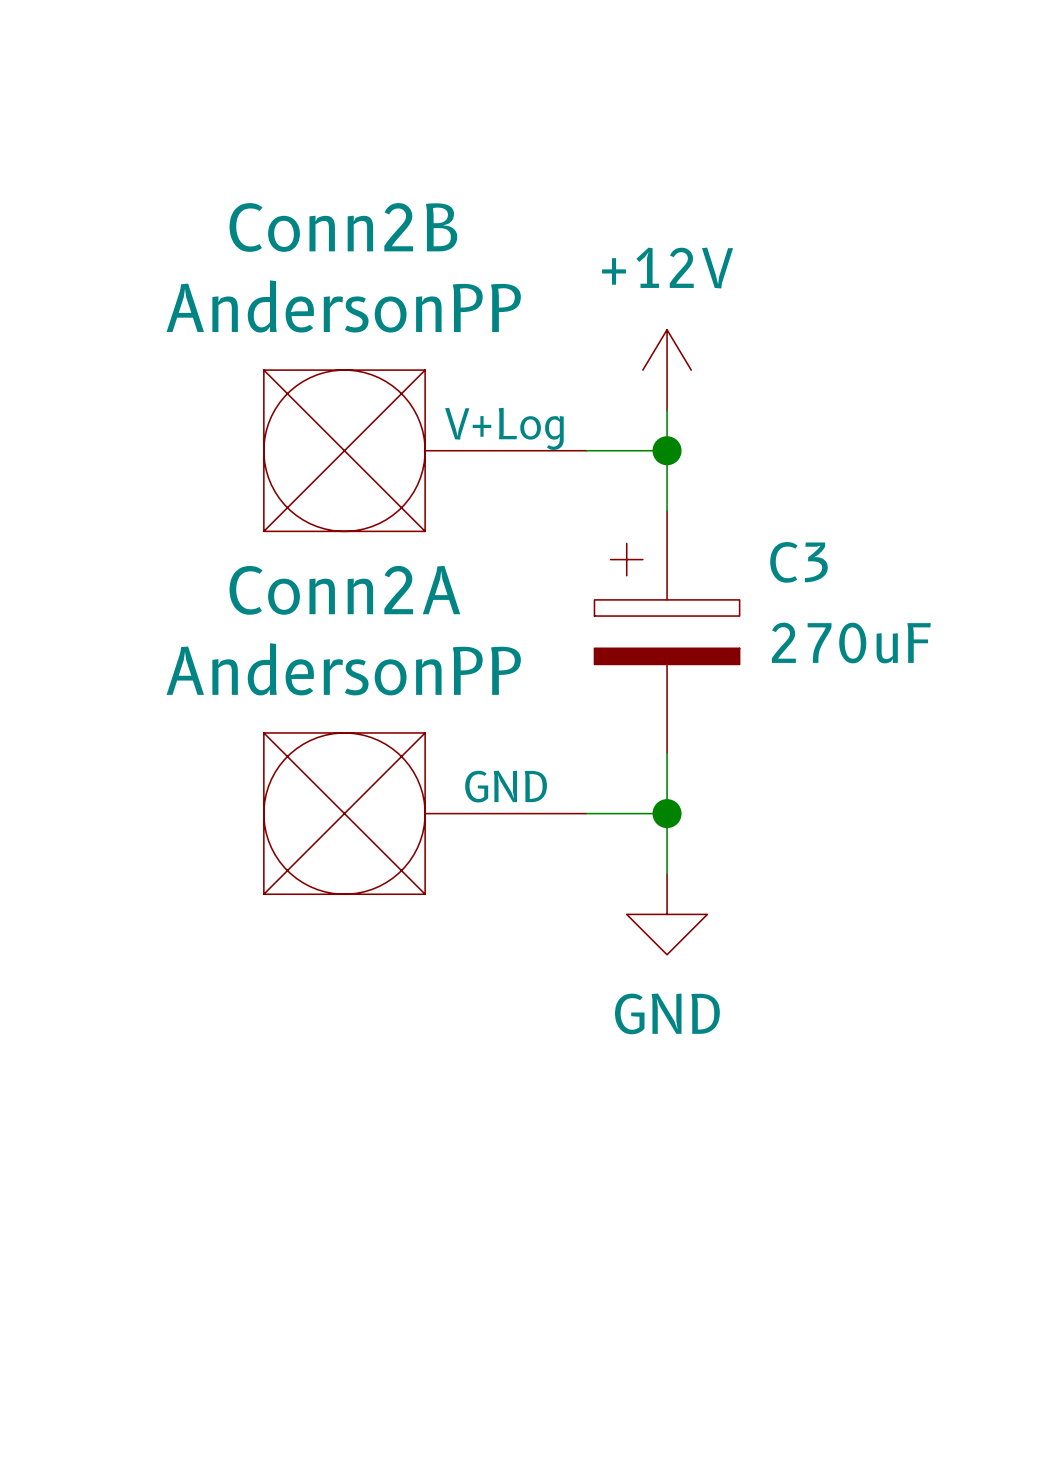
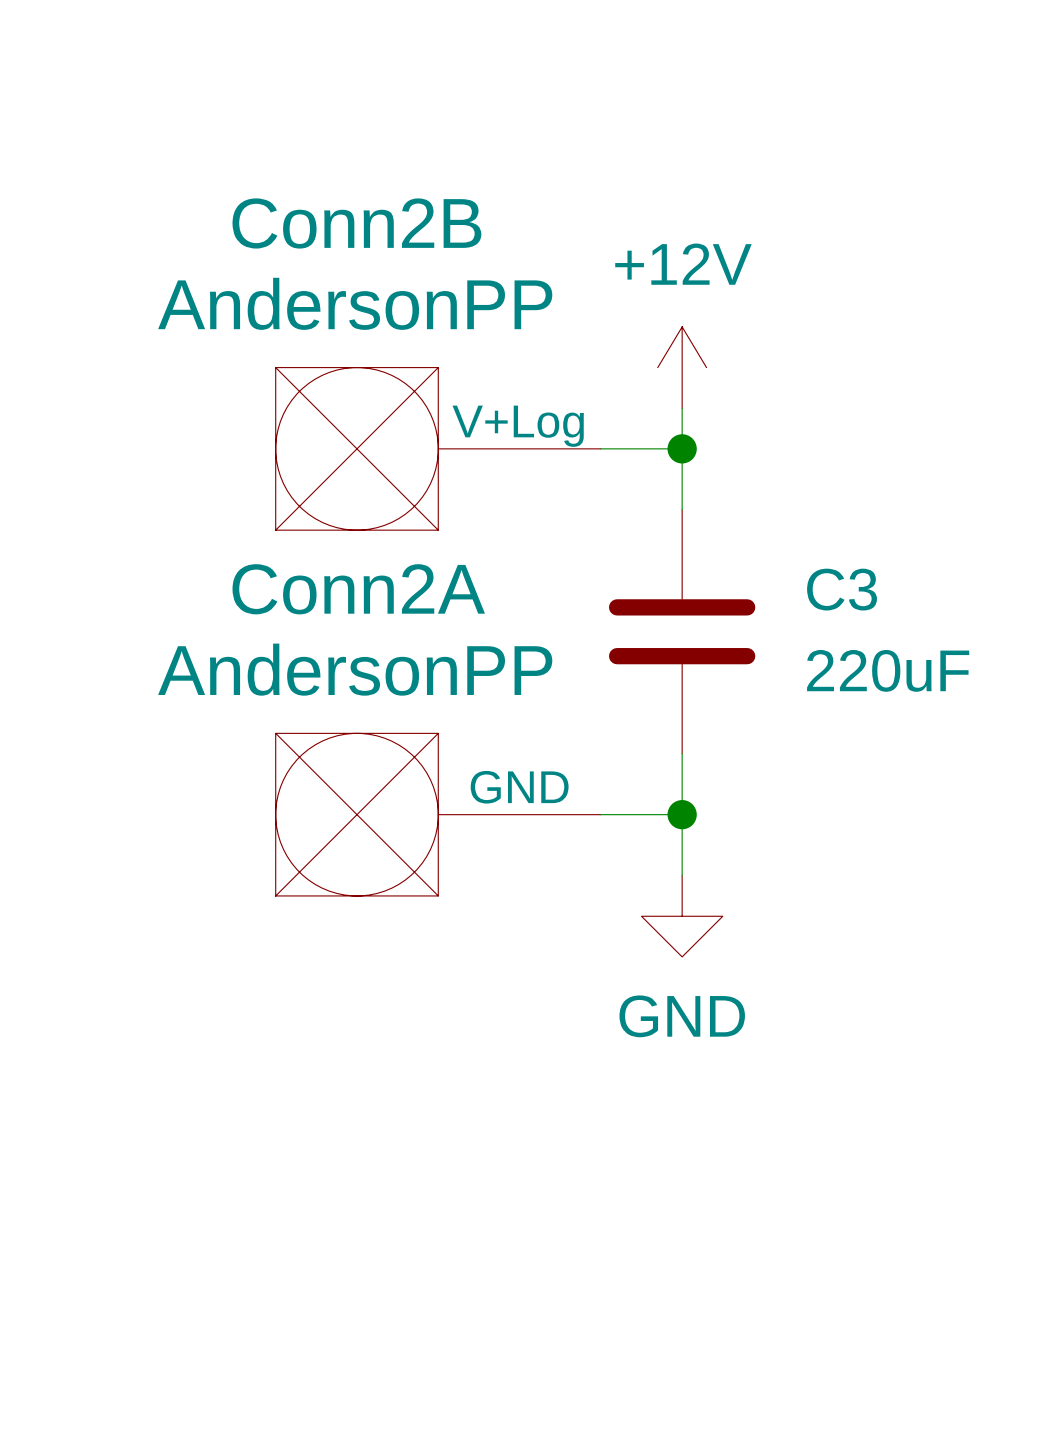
C3 symbol: [594, 511, 740, 754] -> [608, 509, 756, 754]
C3 value: 270uF (851, 643) -> 220uF (888, 670)

